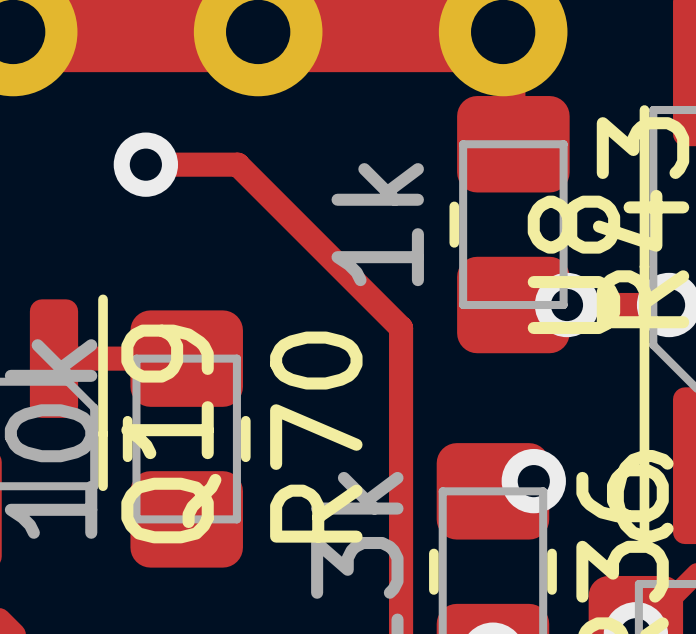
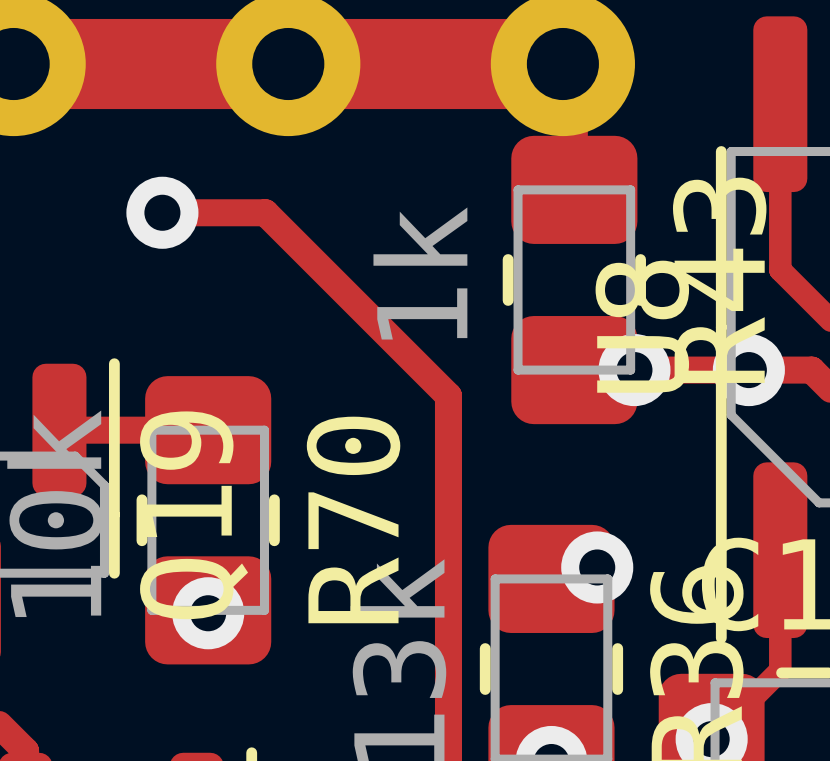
via: none -> (208, 613)

